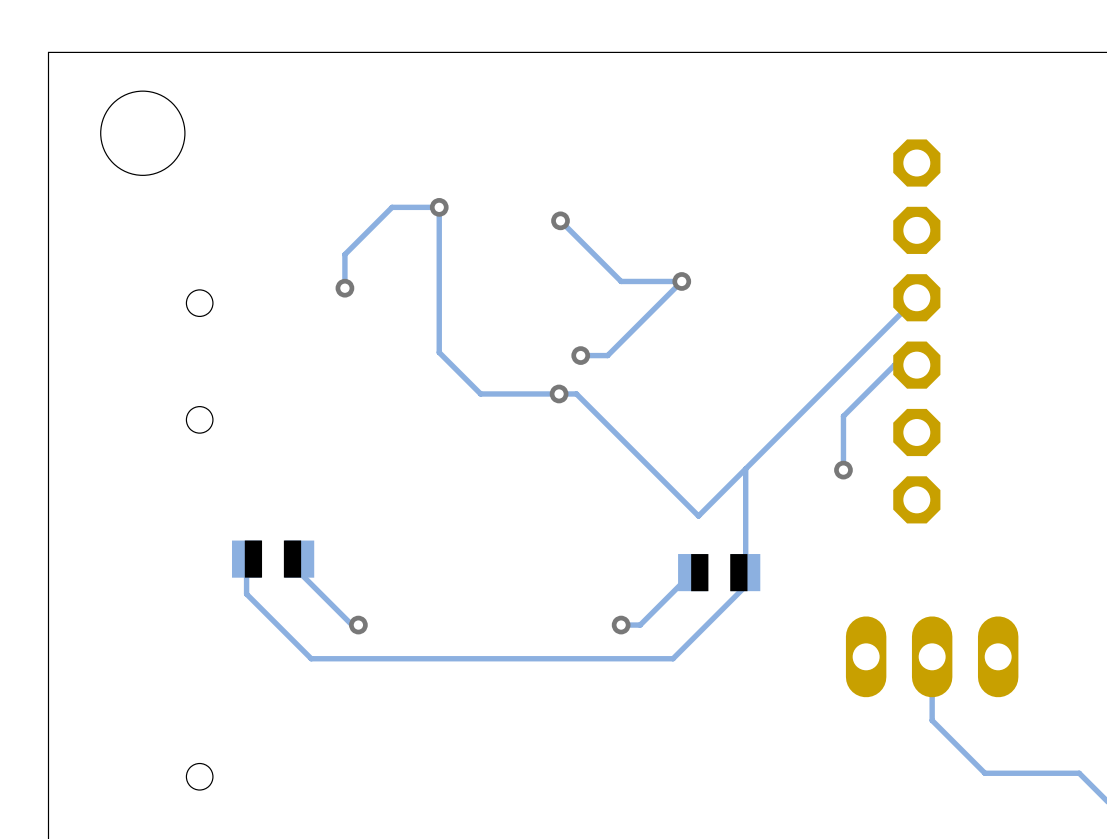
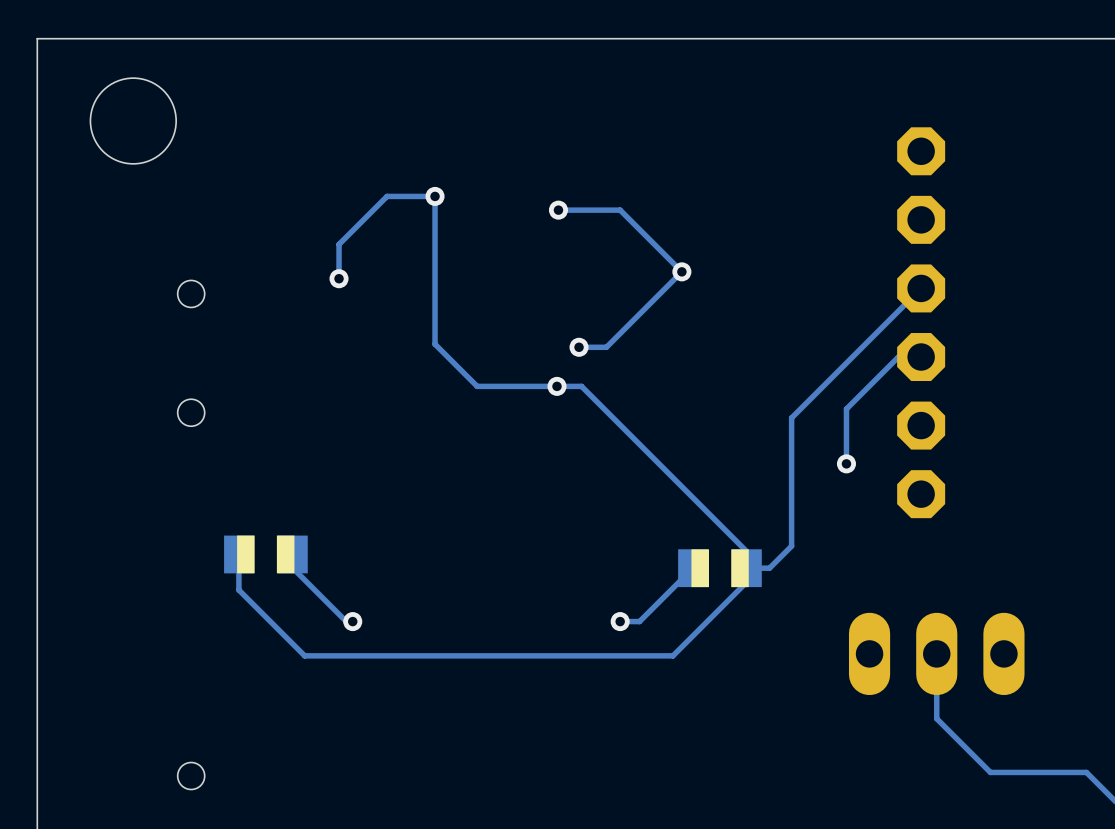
track: (560, 220) (621, 281) (681, 281) -> (558, 210) (620, 210) (681, 271)
track: (576, 393) (698, 516) (789, 425) -> (574, 386) (581, 386) (746, 551)
track: none -> (791, 417) (791, 546) (769, 568) (746, 568)
track: (745, 468) (745, 556) -> none

